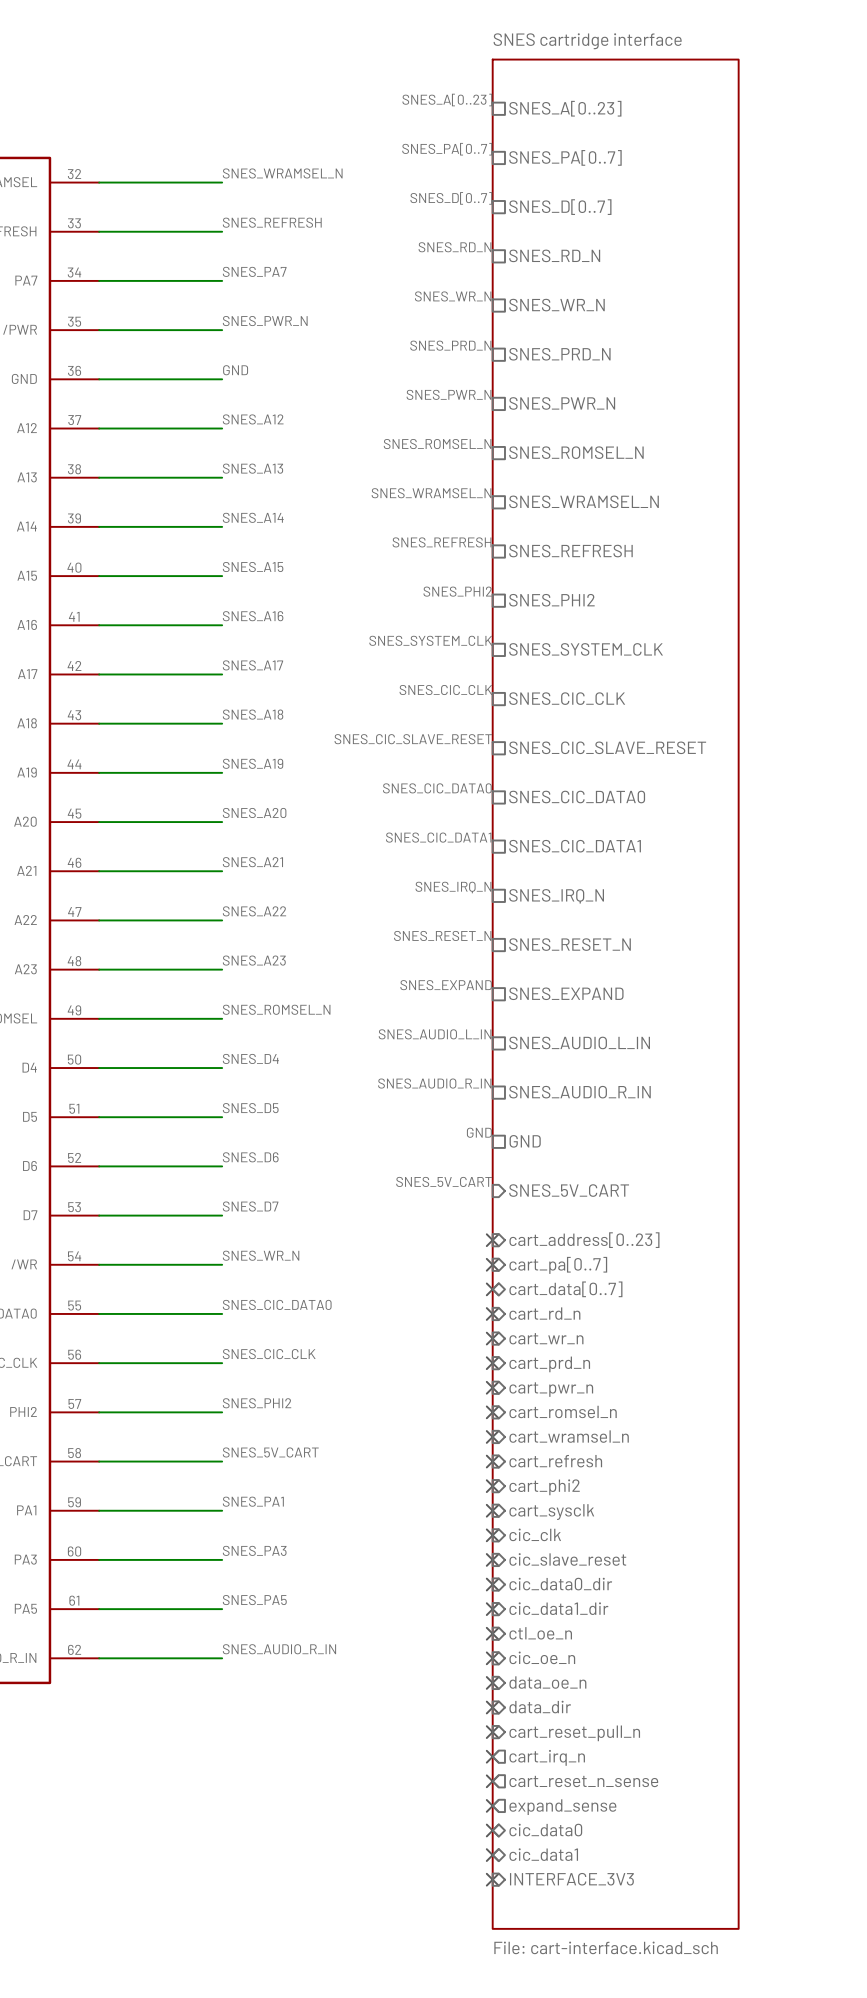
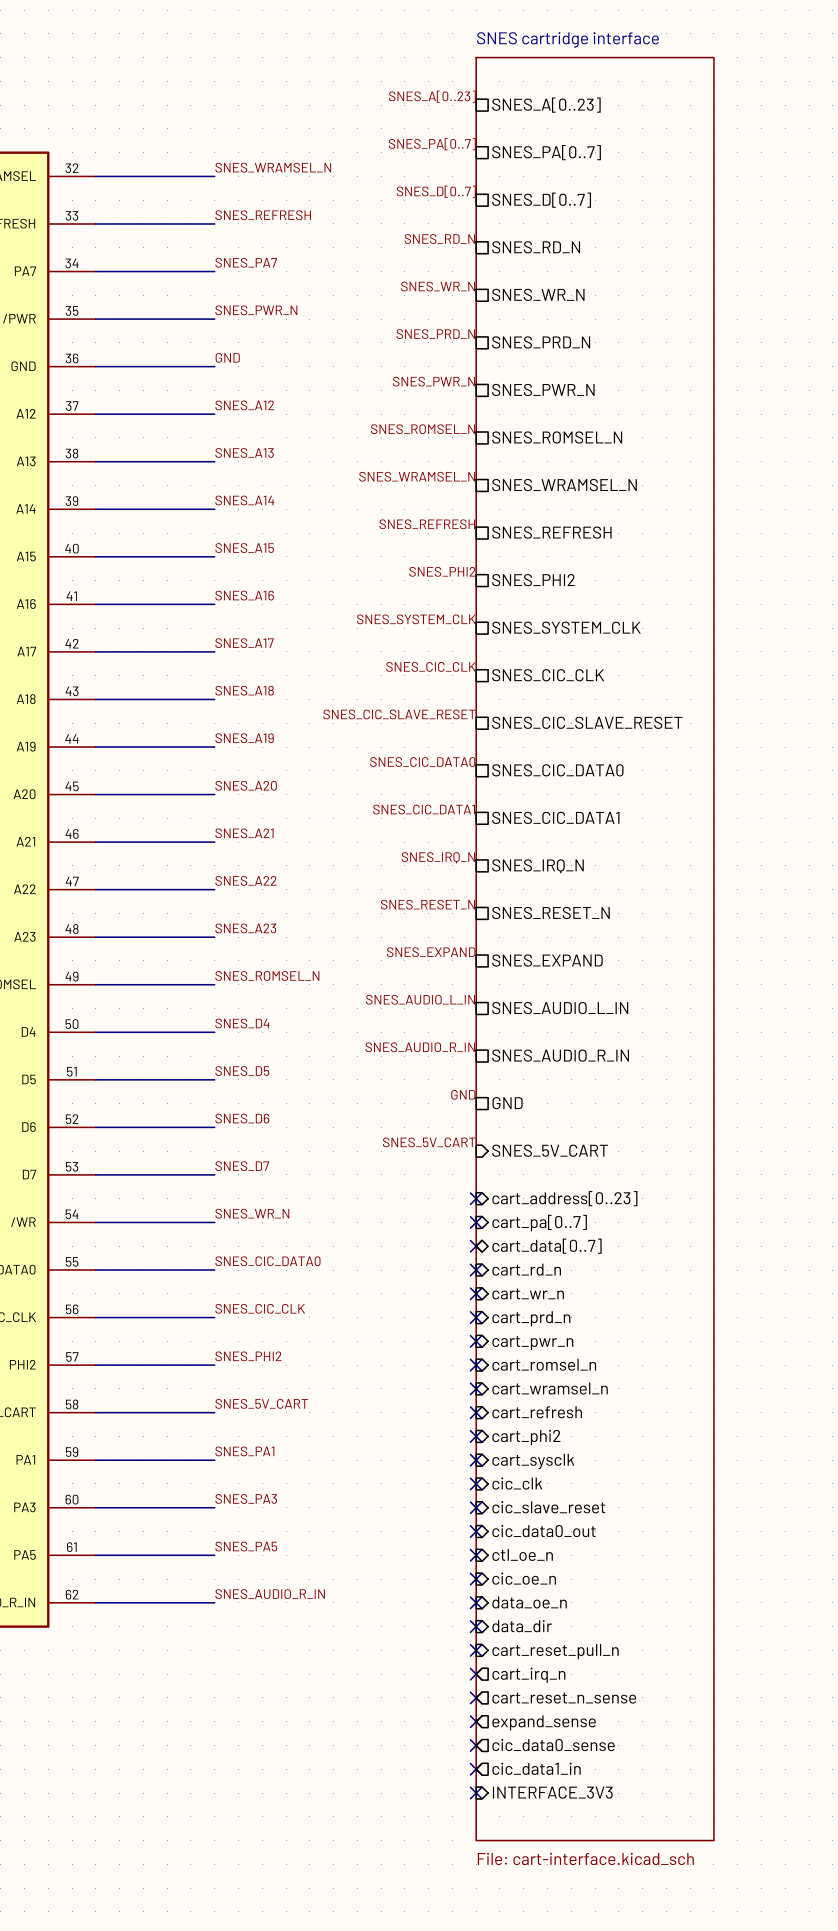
sheet SNES cartridge interface: none -> File: cart-interface.kicad_sch (595, 949)
sheet SNES cartridge interface: File: cart-interface.kicad_sch (615, 994) -> none
sheet pin: cic_data0_dir (560, 1584) -> cic_data0_out (544, 1531)
sheet pin: cic_data1_dir (558, 1608) -> ctl_oe_n (522, 1554)
sheet pin: ctl_oe_n (540, 1633) -> cic_oe_n (524, 1578)
sheet pin: cic_oe_n (542, 1657) -> data_oe_n (529, 1602)
sheet pin: data_oe_n (547, 1682) -> data_dir (522, 1626)
sheet pin: data_dir (540, 1707) -> cart_reset_pull_n (555, 1651)
sheet pin shape: input (574, 1733) -> output (528, 1675)
sheet pin: cart_reset_pull_n (574, 1733) -> cart_irq_n (528, 1675)
sheet pin: cart_irq_n (547, 1757) -> cart_reset_n_sense (564, 1698)
sheet pin: cart_reset_n_sense (583, 1781) -> expand_sense (544, 1722)
sheet pin: expand_sense (562, 1807) -> cic_data0_sense (553, 1745)
sheet pin shape: bidirectional (545, 1830) -> output (536, 1768)
sheet pin: cic_data0 (545, 1830) -> cic_data1_in (536, 1768)
sheet pin shape: bidirectional (543, 1854) -> input (552, 1792)
sheet pin: cic_data1 (543, 1854) -> INTERFACE_3V3 (552, 1792)
no-connect mark: (492, 1879) -> none
sheet pin: INTERFACE_3V3 (571, 1879) -> none

